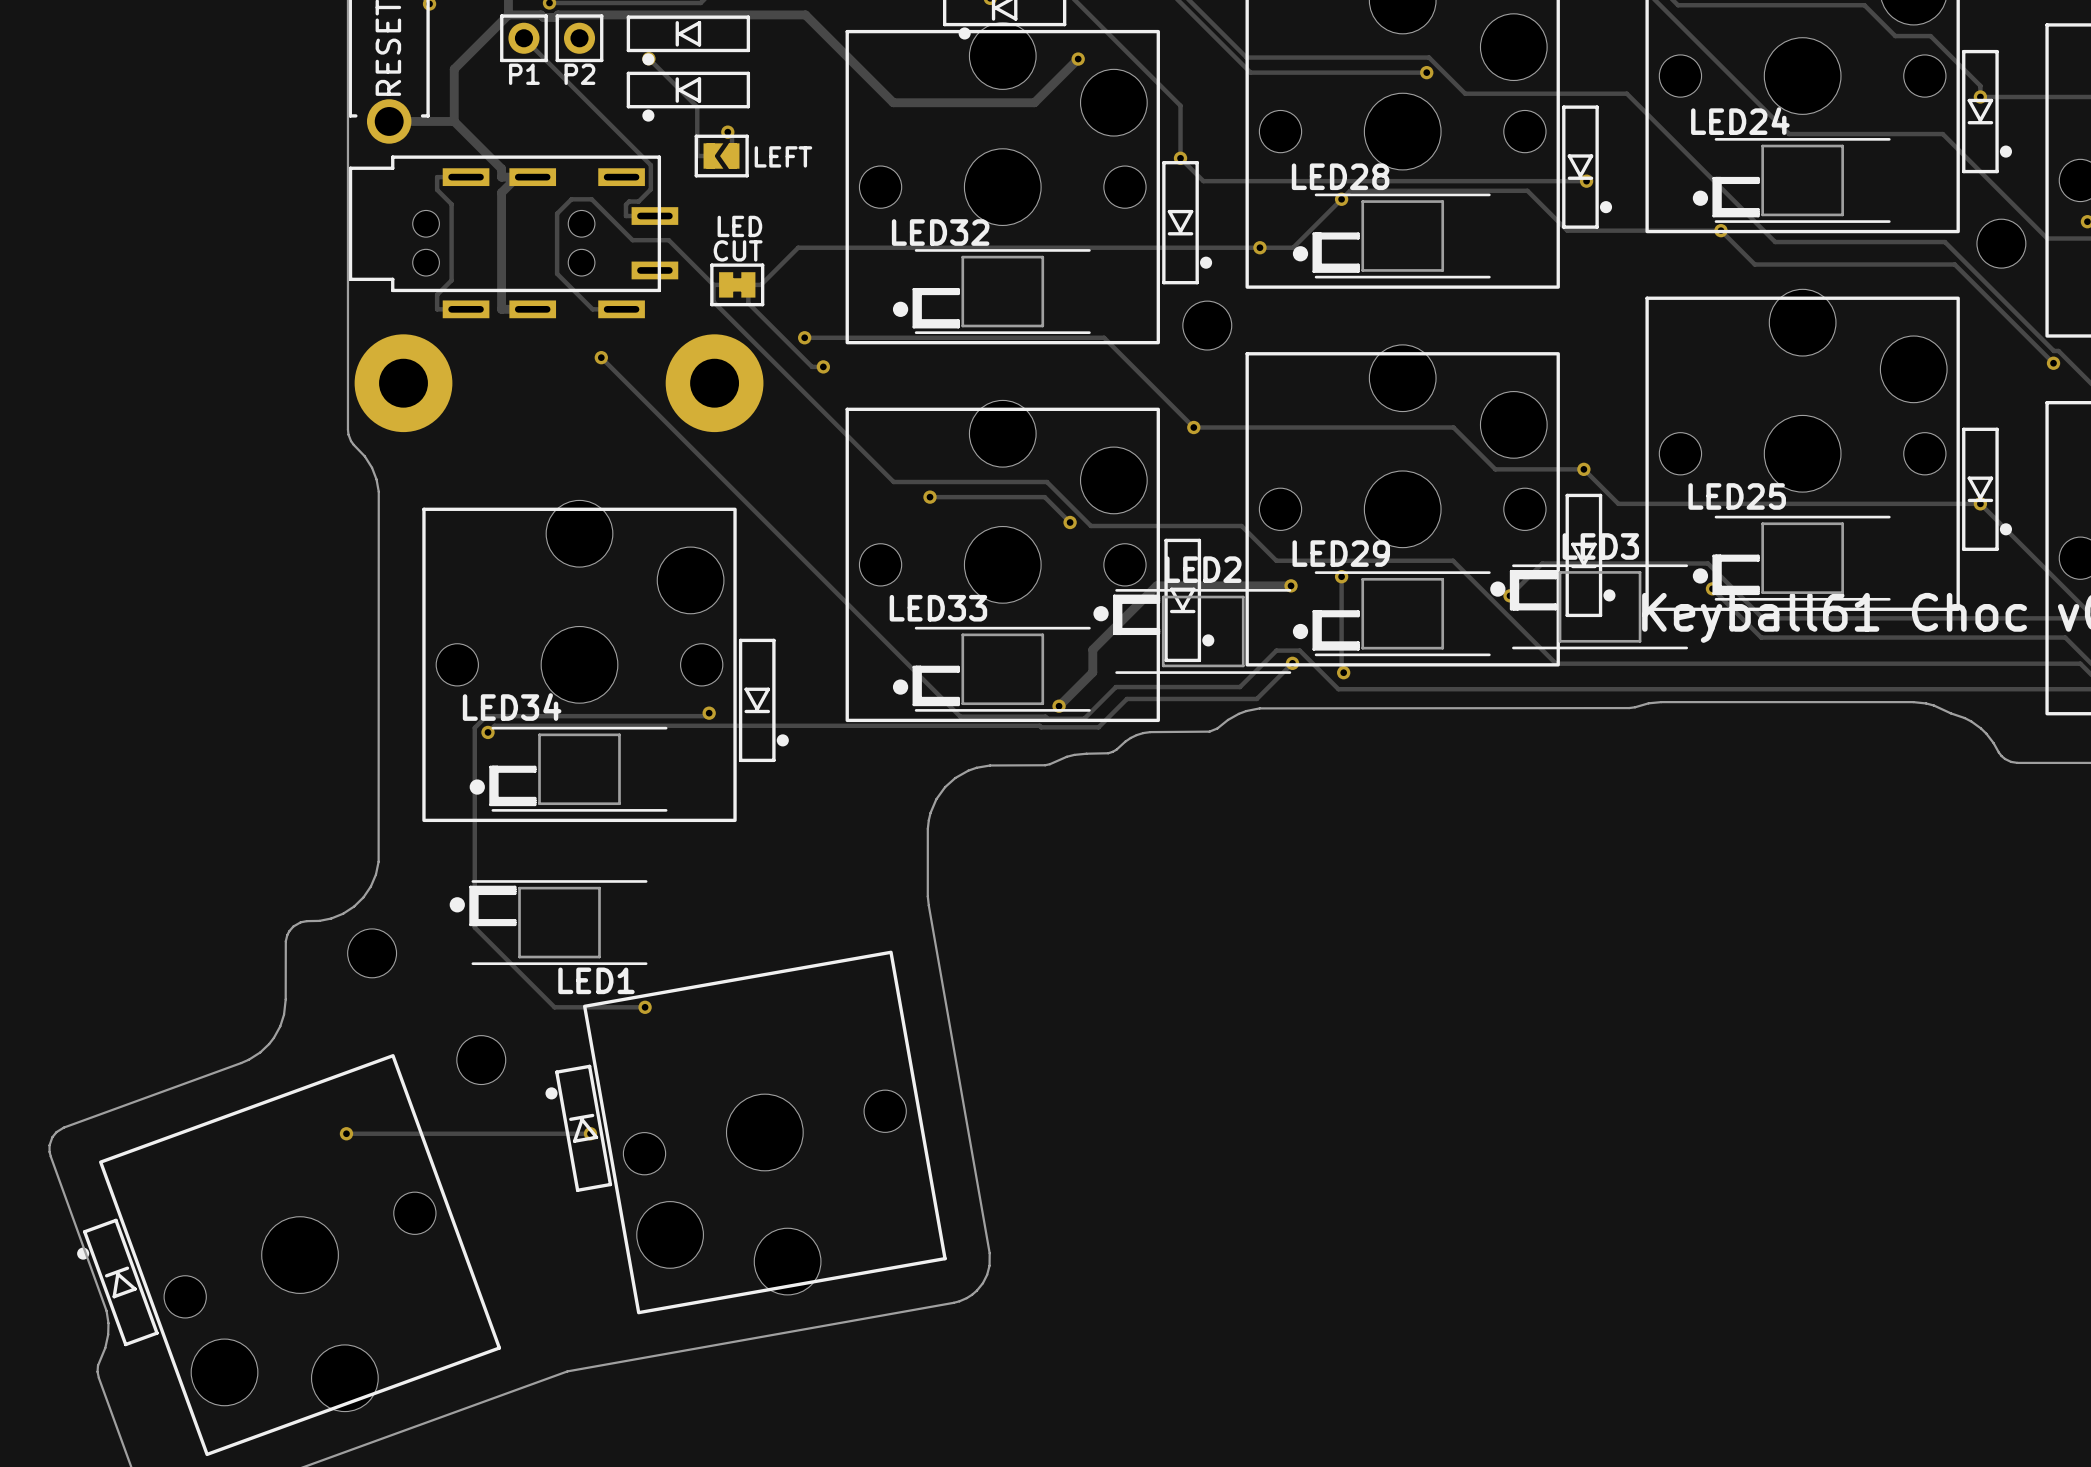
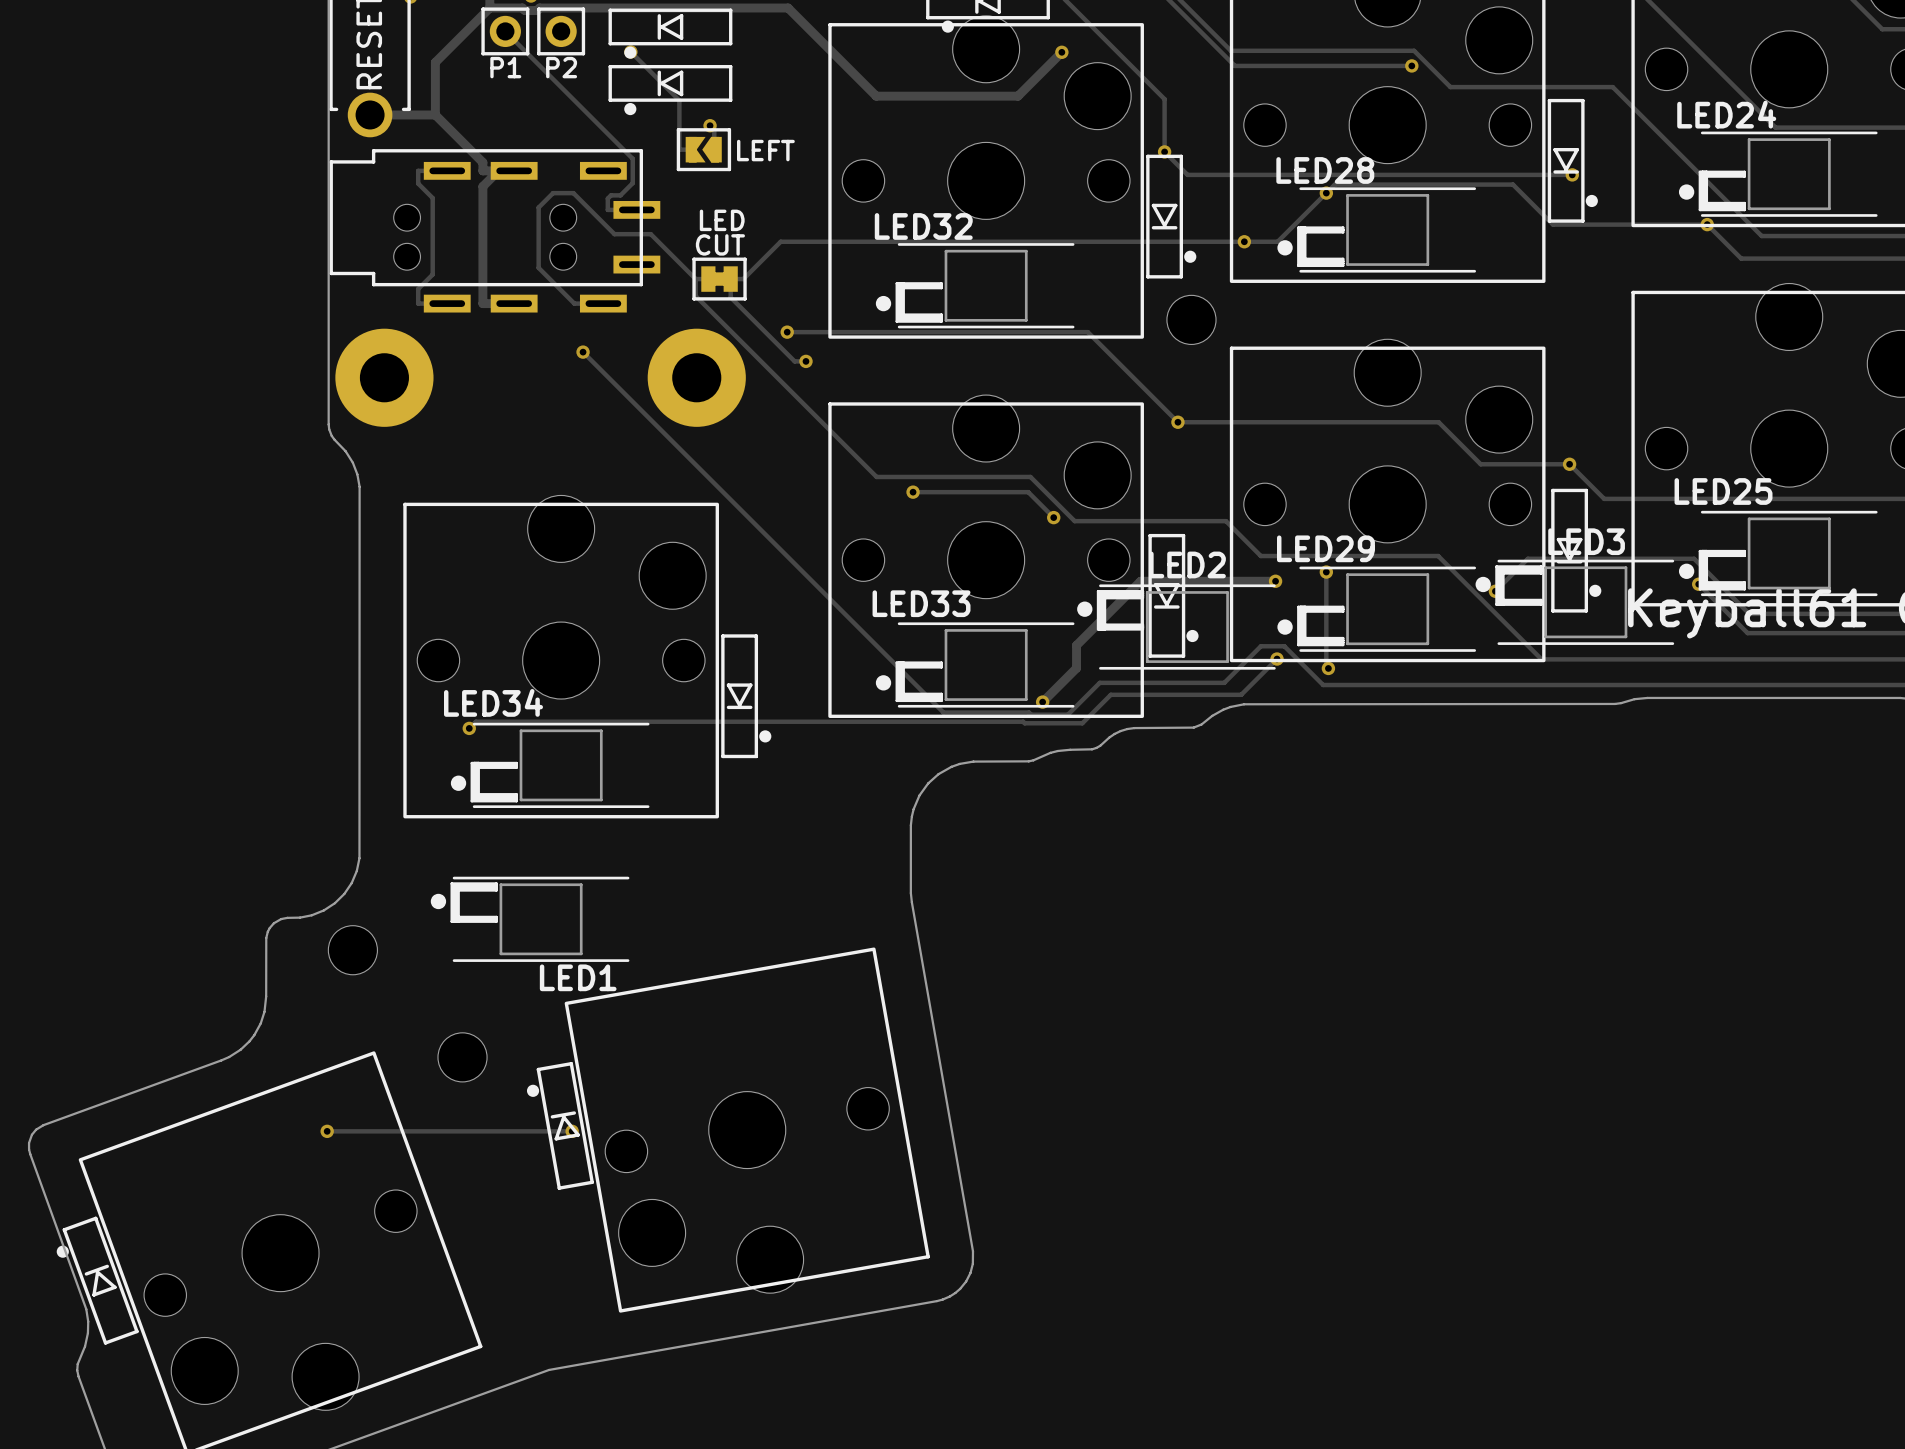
track: (709, 713) (706, 716) (486, 716) (474, 727) (474, 927) (554, 1007) (645, 1007) -> none
via: (709, 713) -> none
via: (645, 1007) -> none

